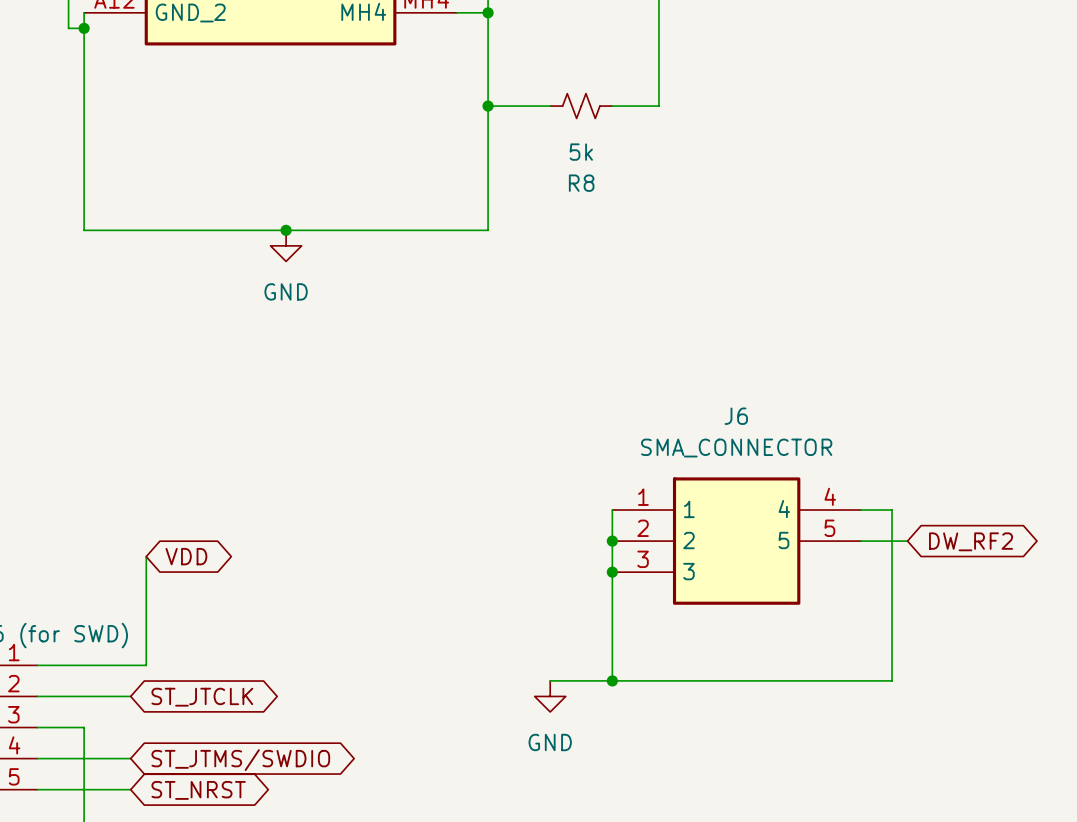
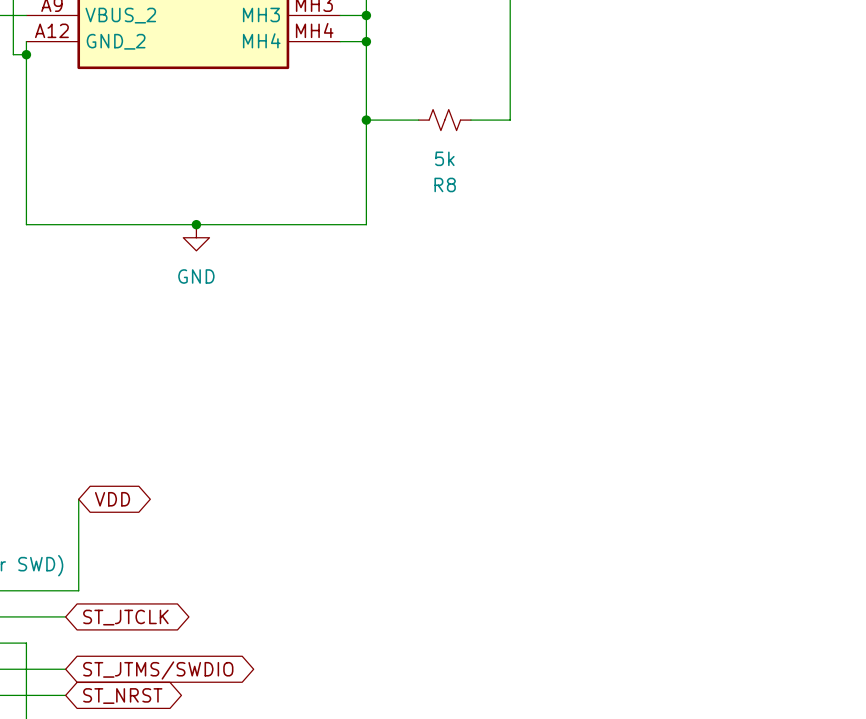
wire: (612, 510) (612, 680) -> none
wire: (860, 510) (892, 510) (892, 680) (550, 680) -> none
junction: (612, 541) -> none
J6: SMA_CONNECTOR (736, 541) -> none
wire: (860, 541) (907, 541) -> none
global label: DW_RF2 (971, 541) -> none
junction: (612, 572) -> none
junction: (612, 680) -> none
power symbol: GND (550, 696) -> none

